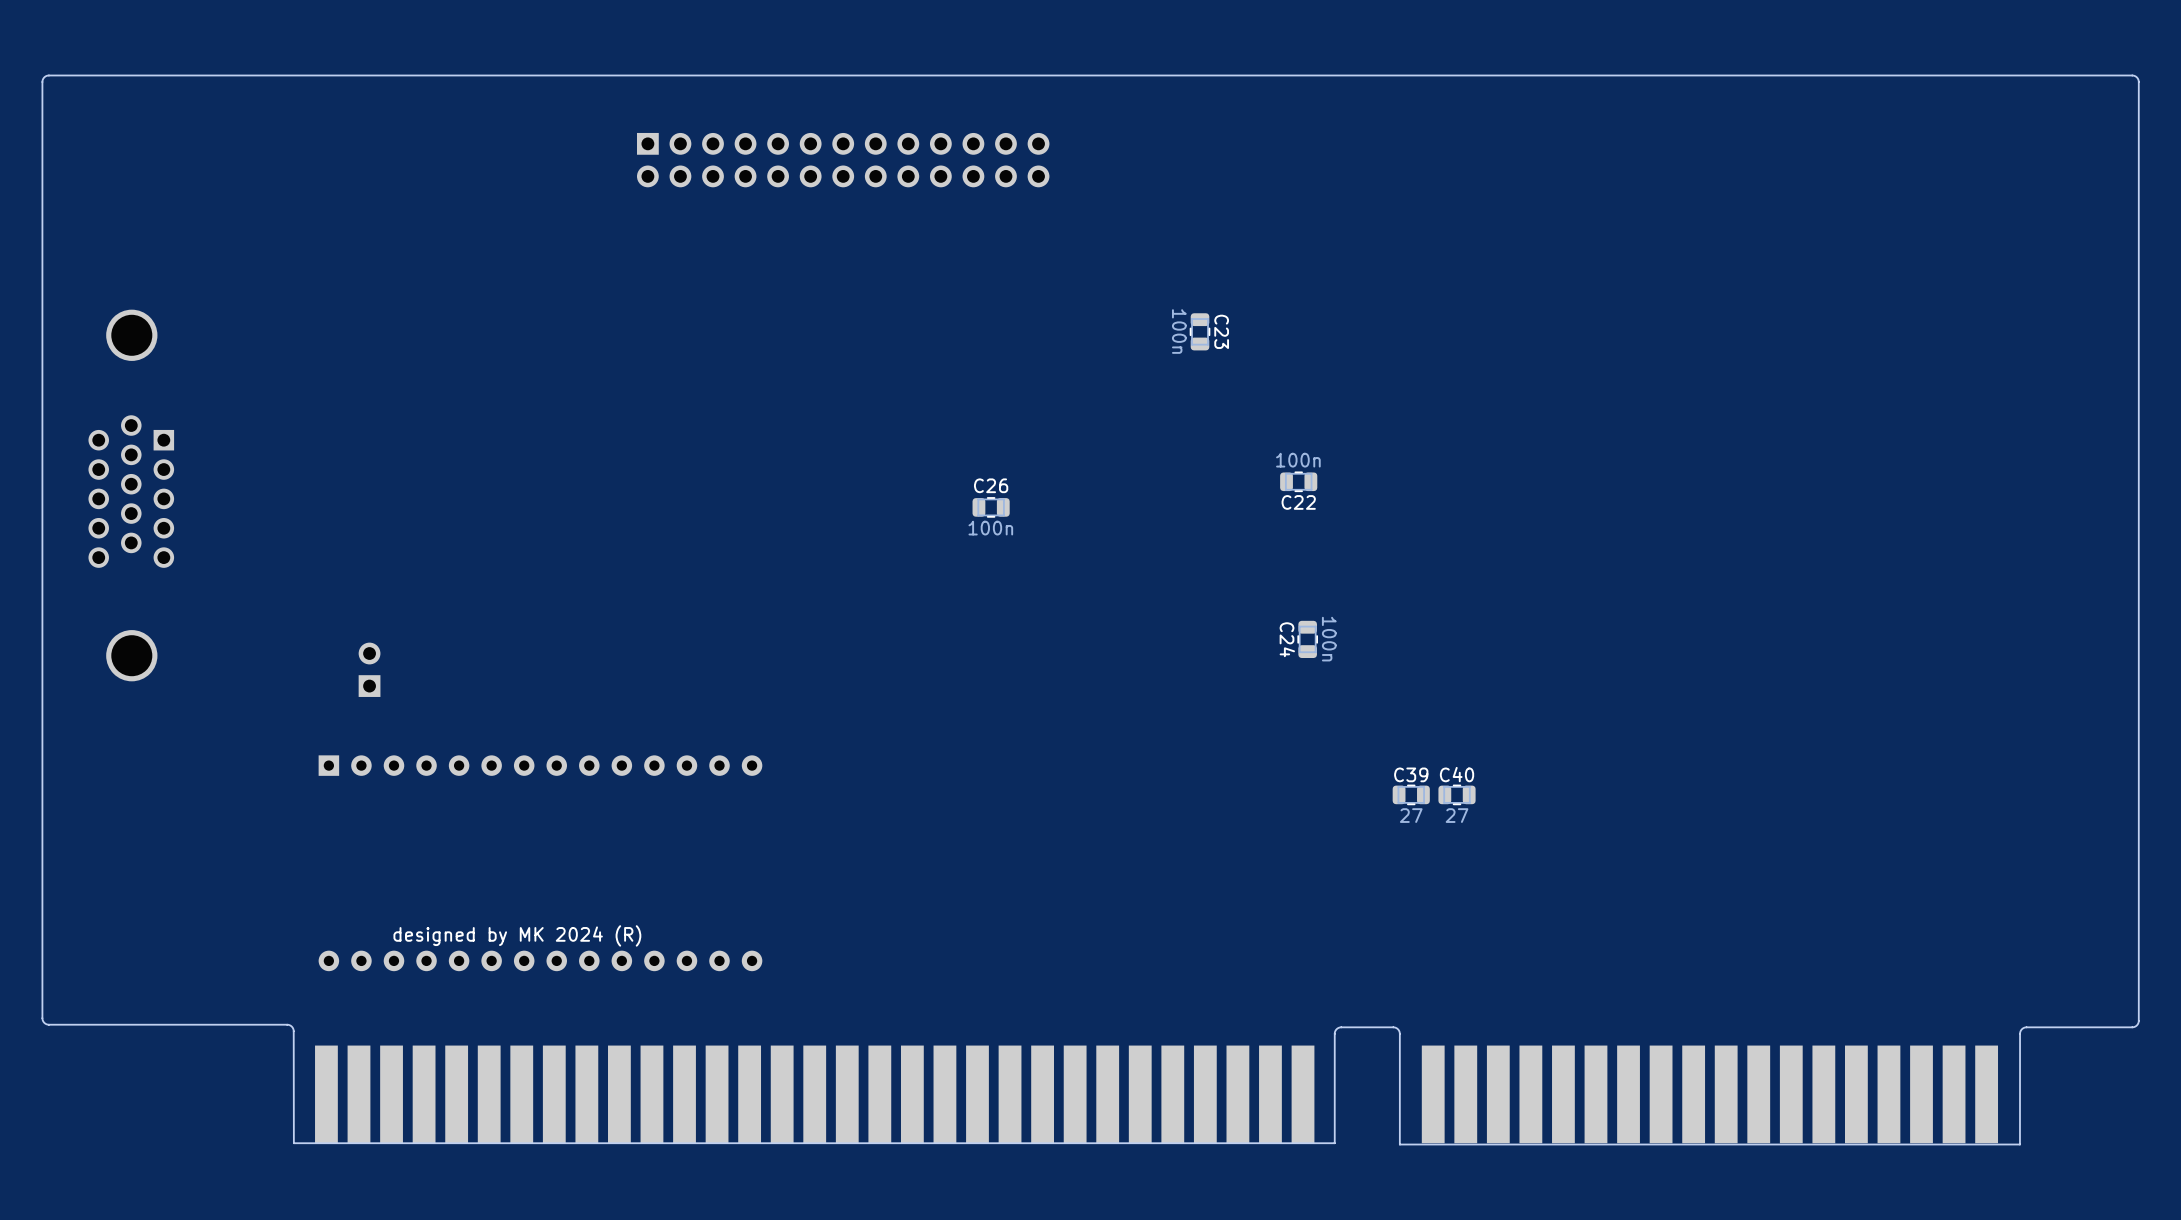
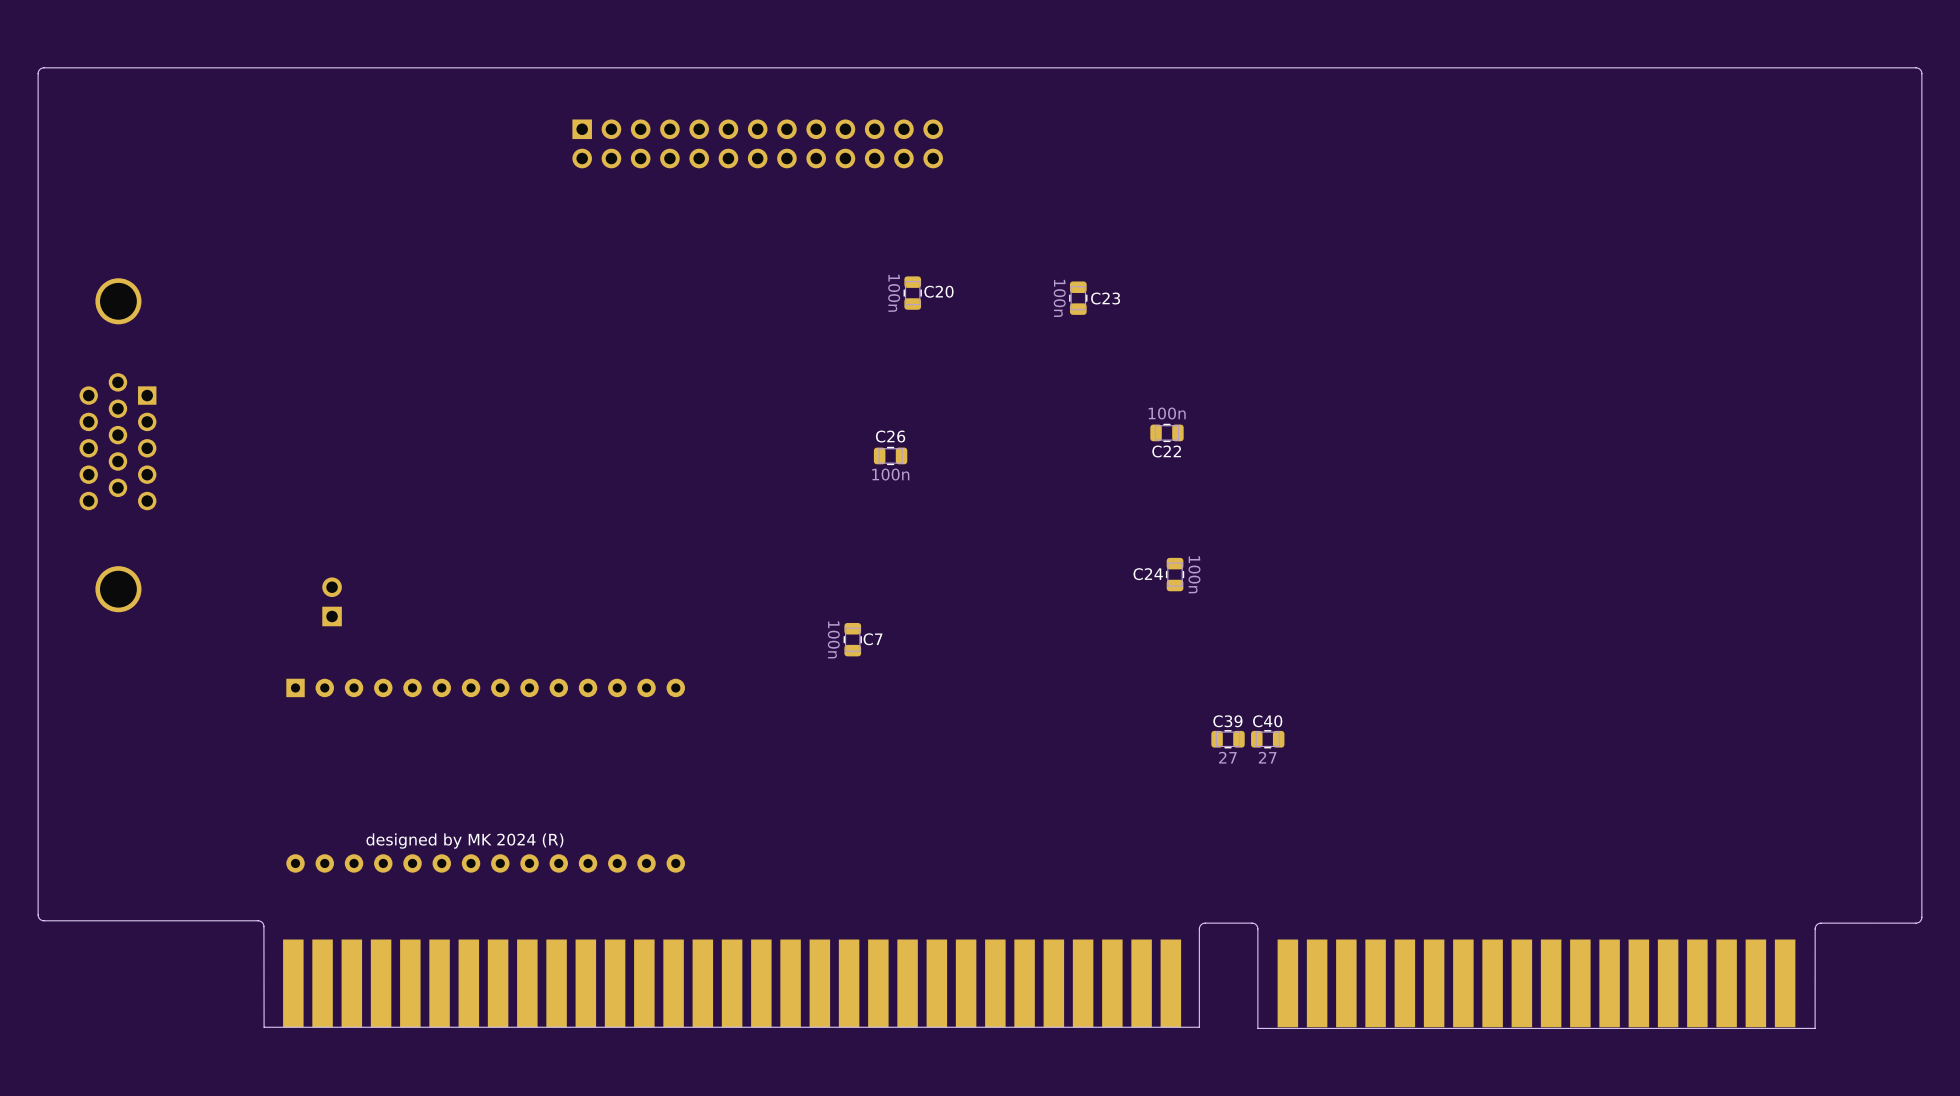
C20: none -> 100n (912, 293)
C23 name rotation: 0° (1221, 331) -> 90° counterclockwise (1105, 298)
C24 name rotation: 0° (1287, 639) -> 90° counterclockwise (1148, 574)
C7: none -> 100n (852, 639)
C39 position: (1411, 794) -> (1228, 739)
C40 position: (1457, 794) -> (1267, 739)

